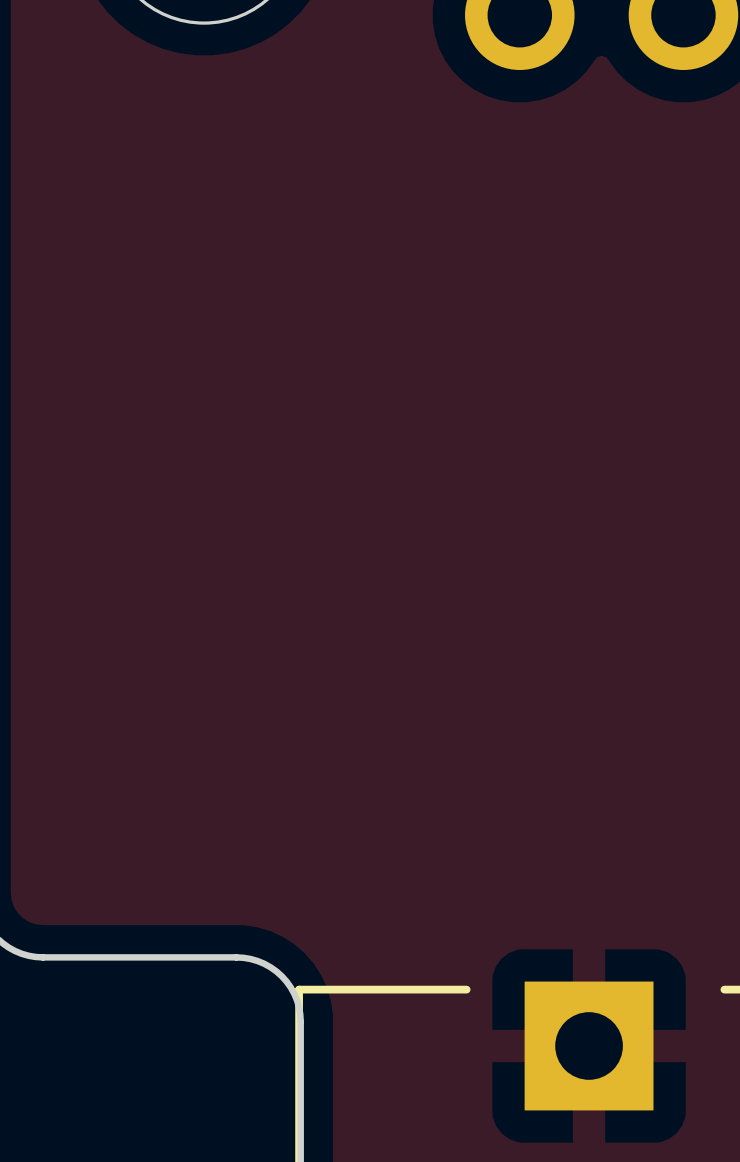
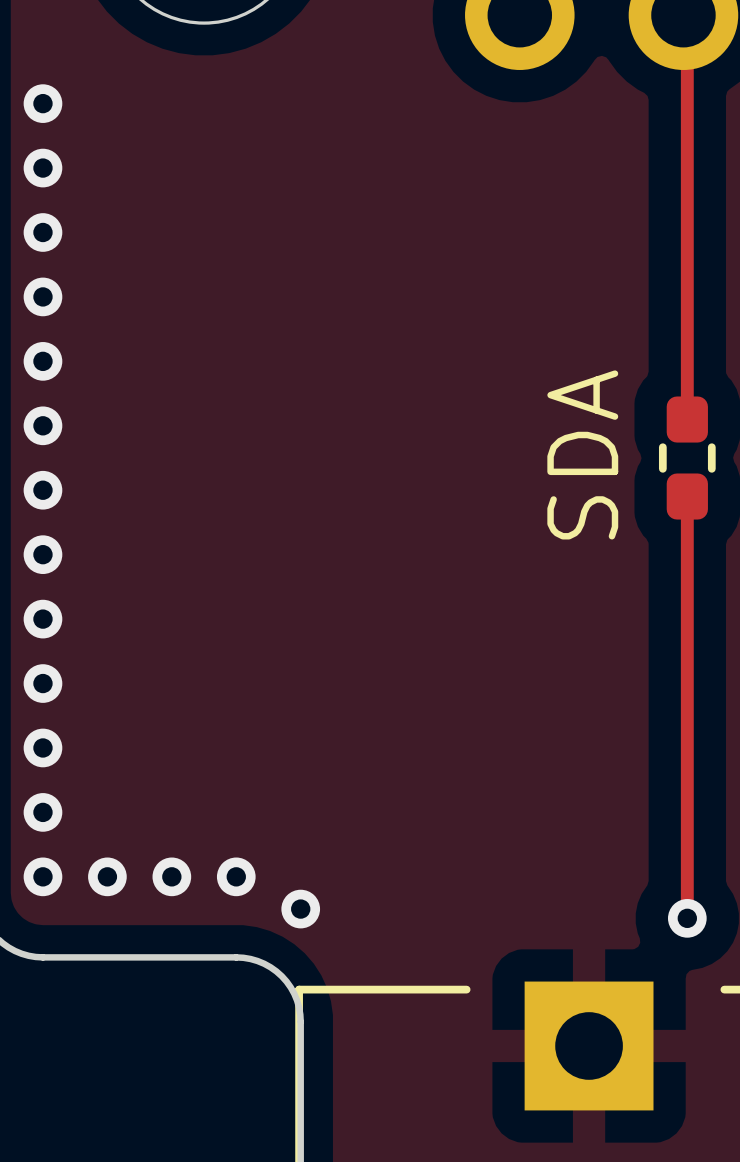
track: none -> (683, 15) (687, 19) (687, 419)
via: none -> (42, 103)
via: none -> (42, 168)
via: none -> (42, 232)
via: none -> (42, 296)
via: none -> (42, 361)
via: none -> (42, 425)
text: none -> SDA (582, 454)
part: none -> (687, 458)
via: none -> (42, 490)
track: none -> (687, 496) (687, 918)
via: none -> (42, 554)
via: none -> (42, 619)
via: none -> (42, 683)
via: none -> (42, 747)
via: none -> (42, 812)
via: none -> (42, 876)
via: none -> (107, 876)
via: none -> (171, 876)
via: none -> (236, 876)
via: none -> (300, 909)
via: none -> (687, 918)

